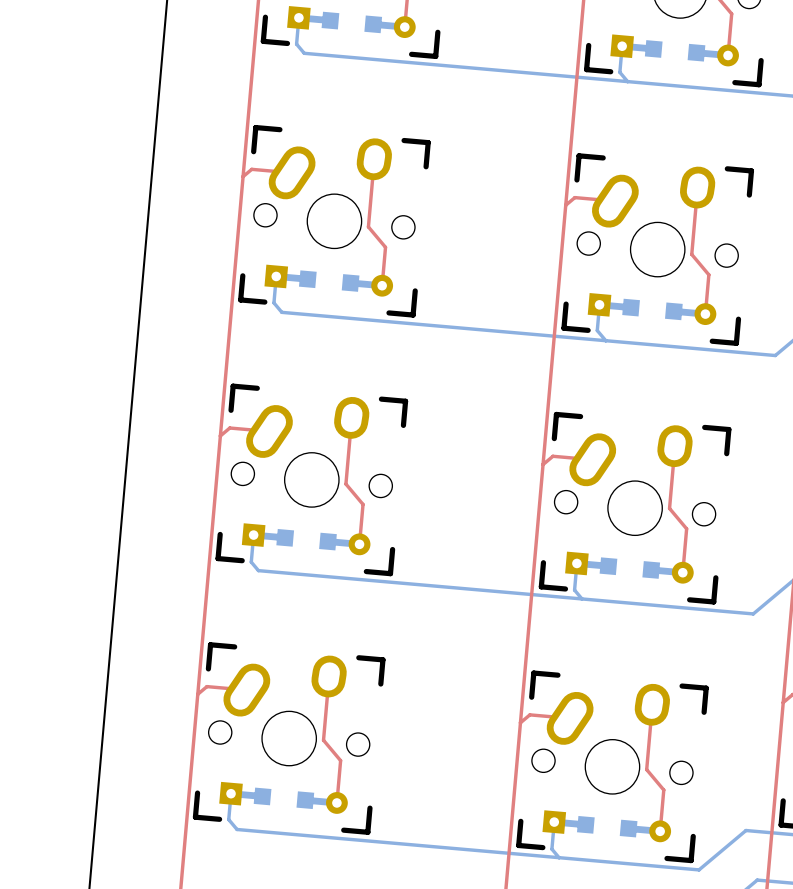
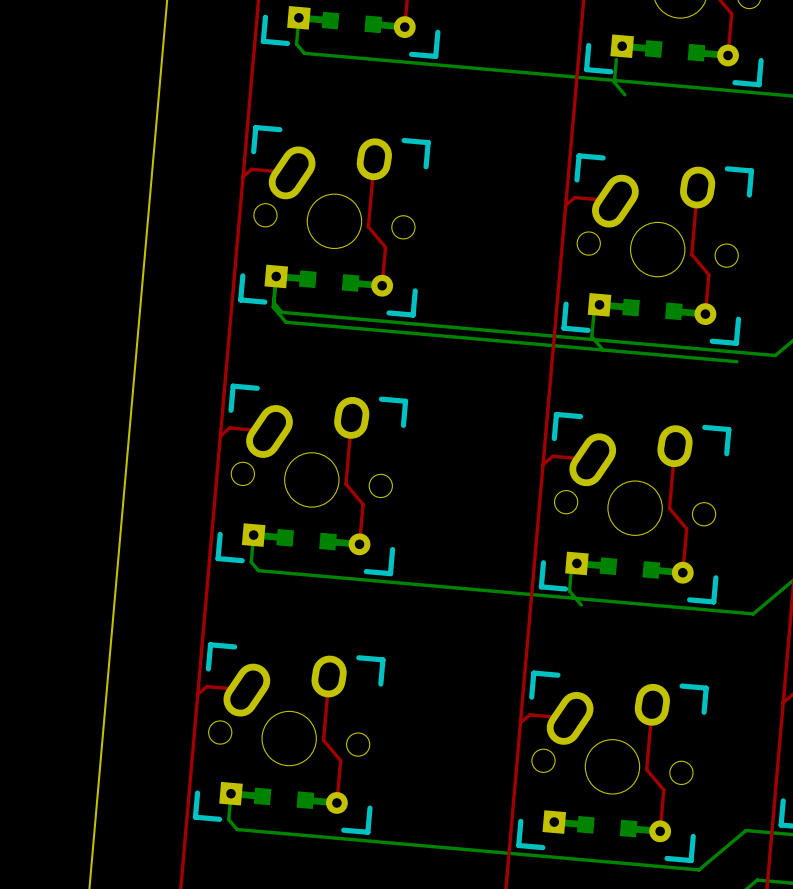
bottom track: (622, 46) (619, 72) (627, 81) -> none
bottom track: none -> (616, 59) (614, 82) (624, 94)
bottom track: none -> (274, 287) (273, 307) (285, 322) (736, 361)
bottom track: (599, 304) (597, 330) (605, 340) -> none
bottom track: none -> (593, 314) (591, 336) (602, 349)
bottom track: (576, 563) (574, 590) (581, 598) -> none
bottom track: none -> (571, 569) (569, 591) (581, 605)
bottom track: (554, 822) (551, 849) (559, 857) -> none

